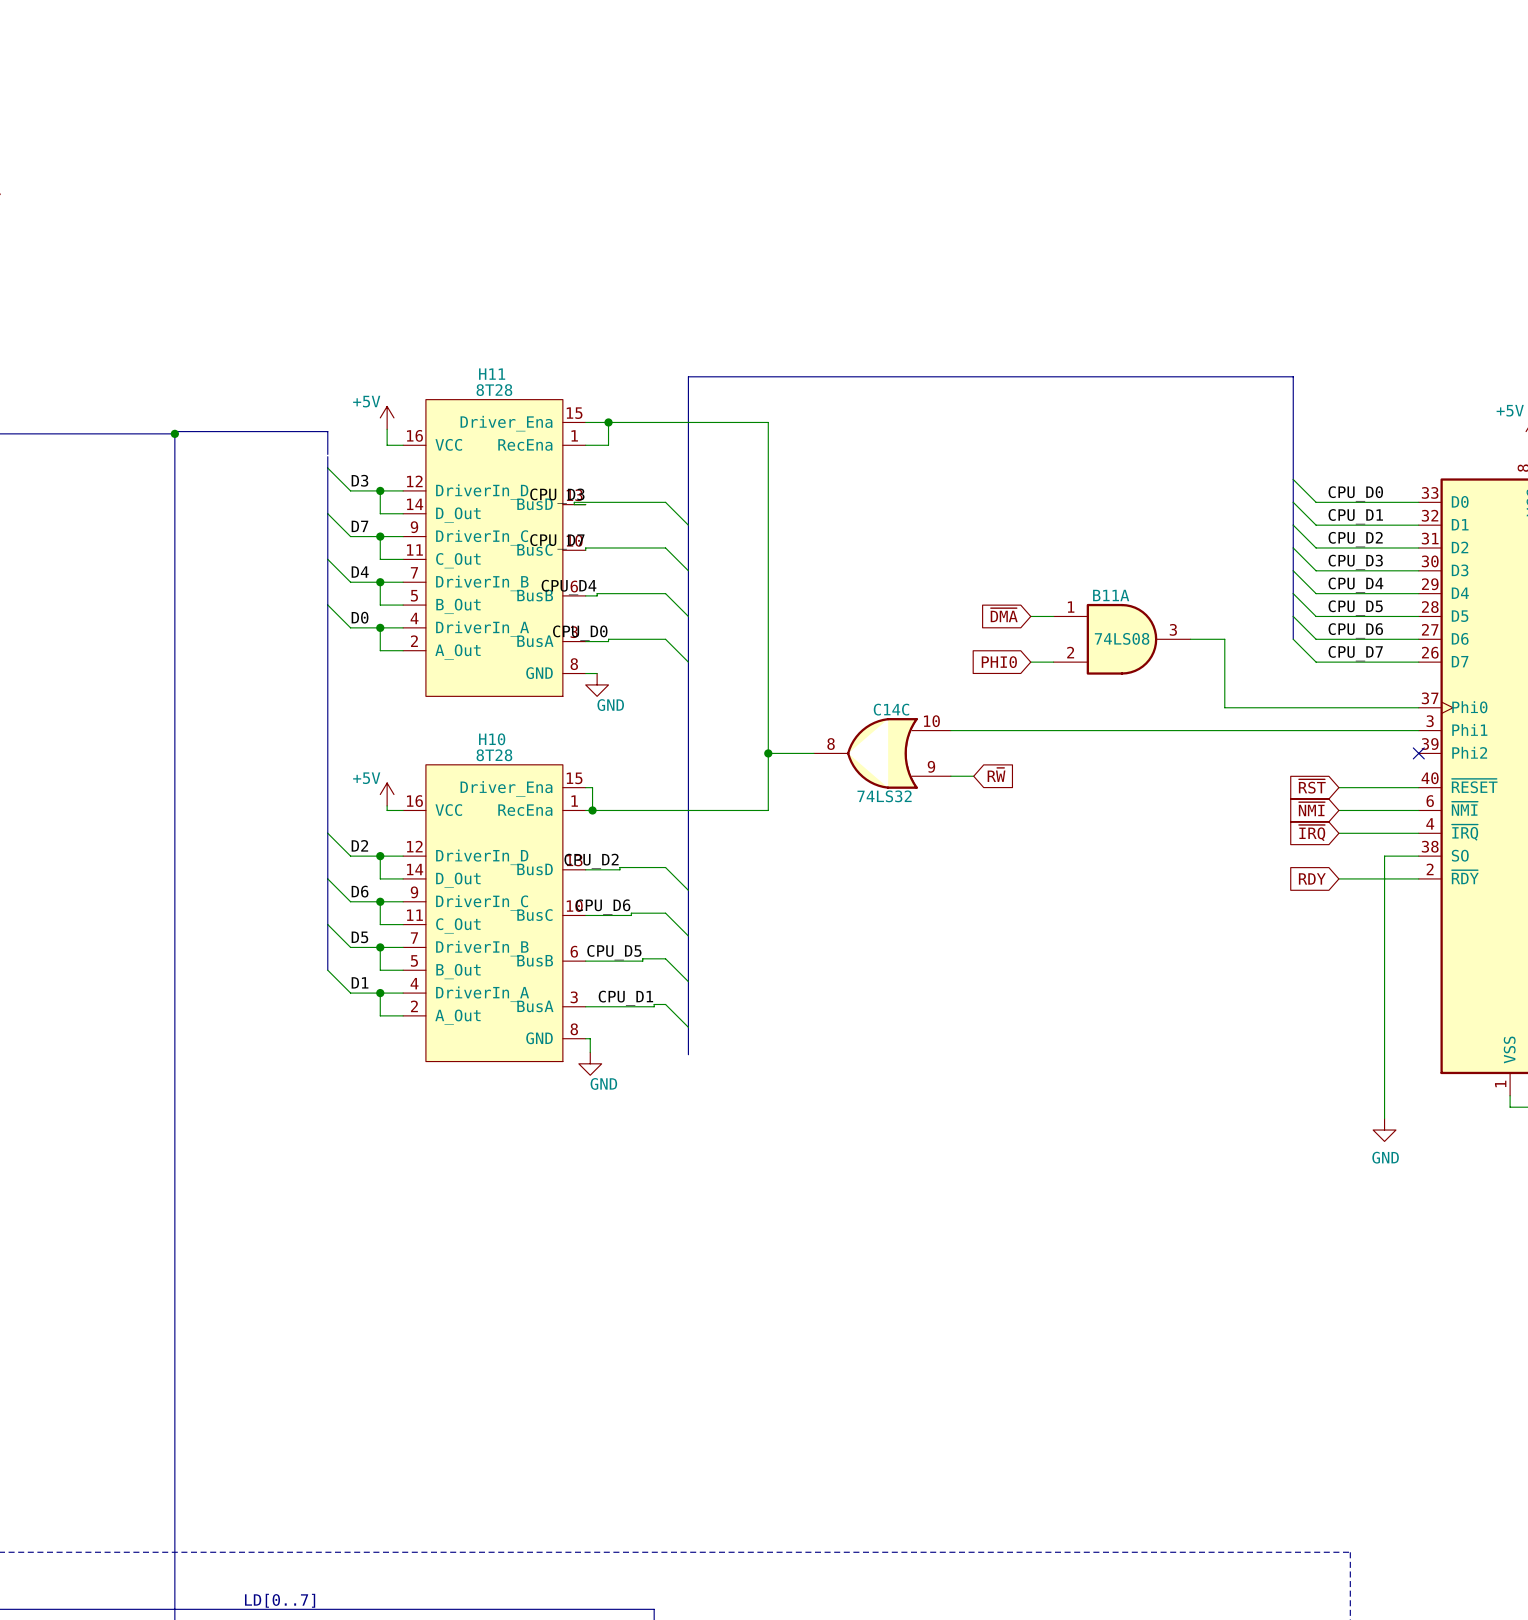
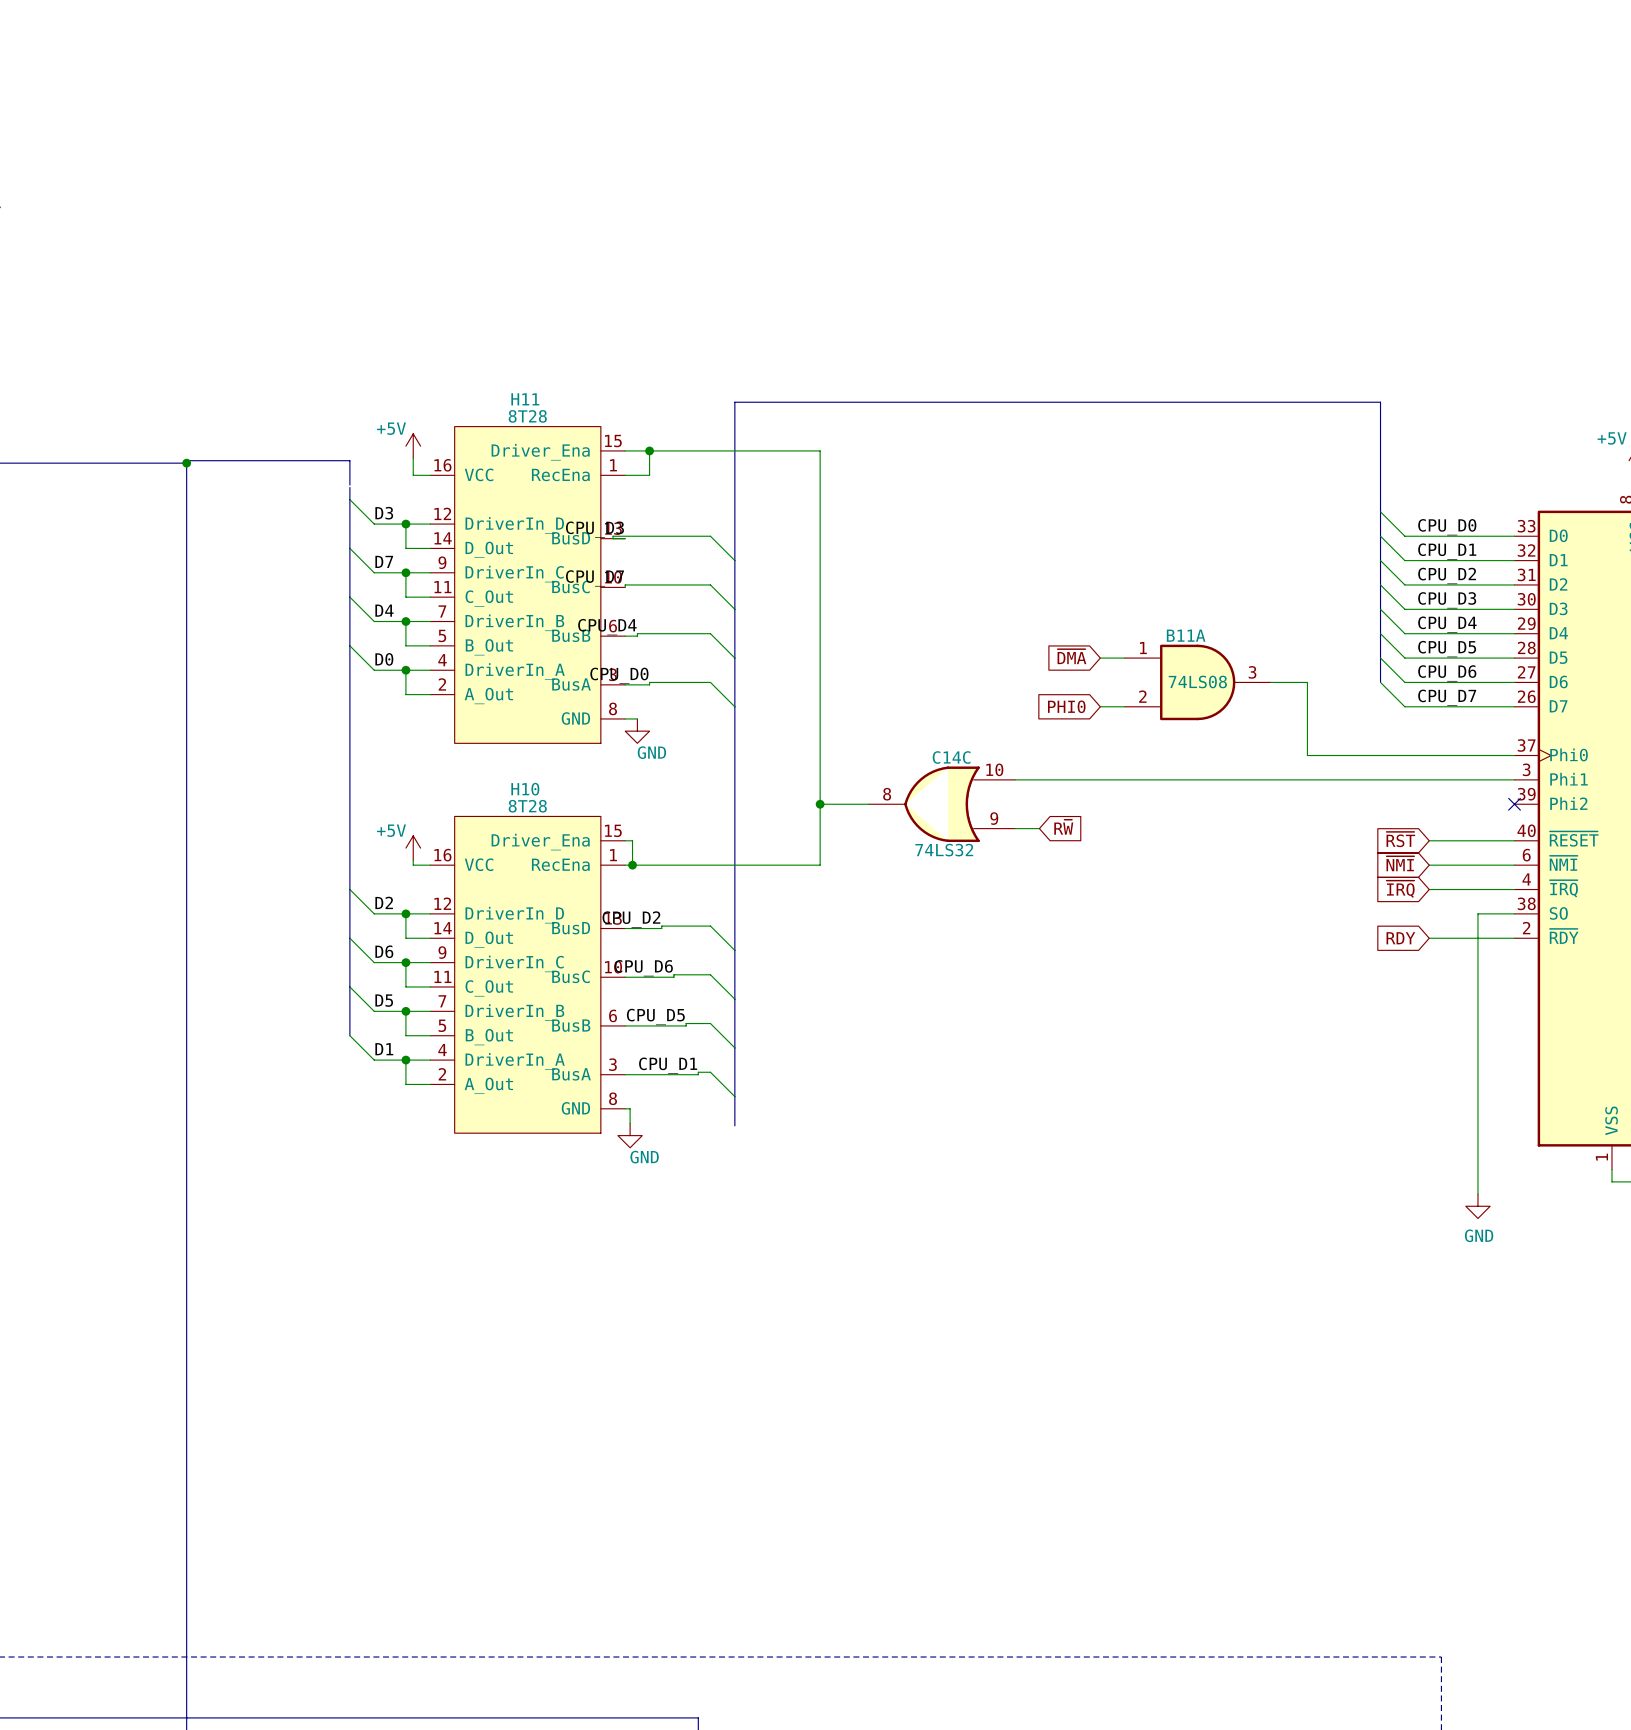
text: LD[0..7] (280, 1600) -> none

